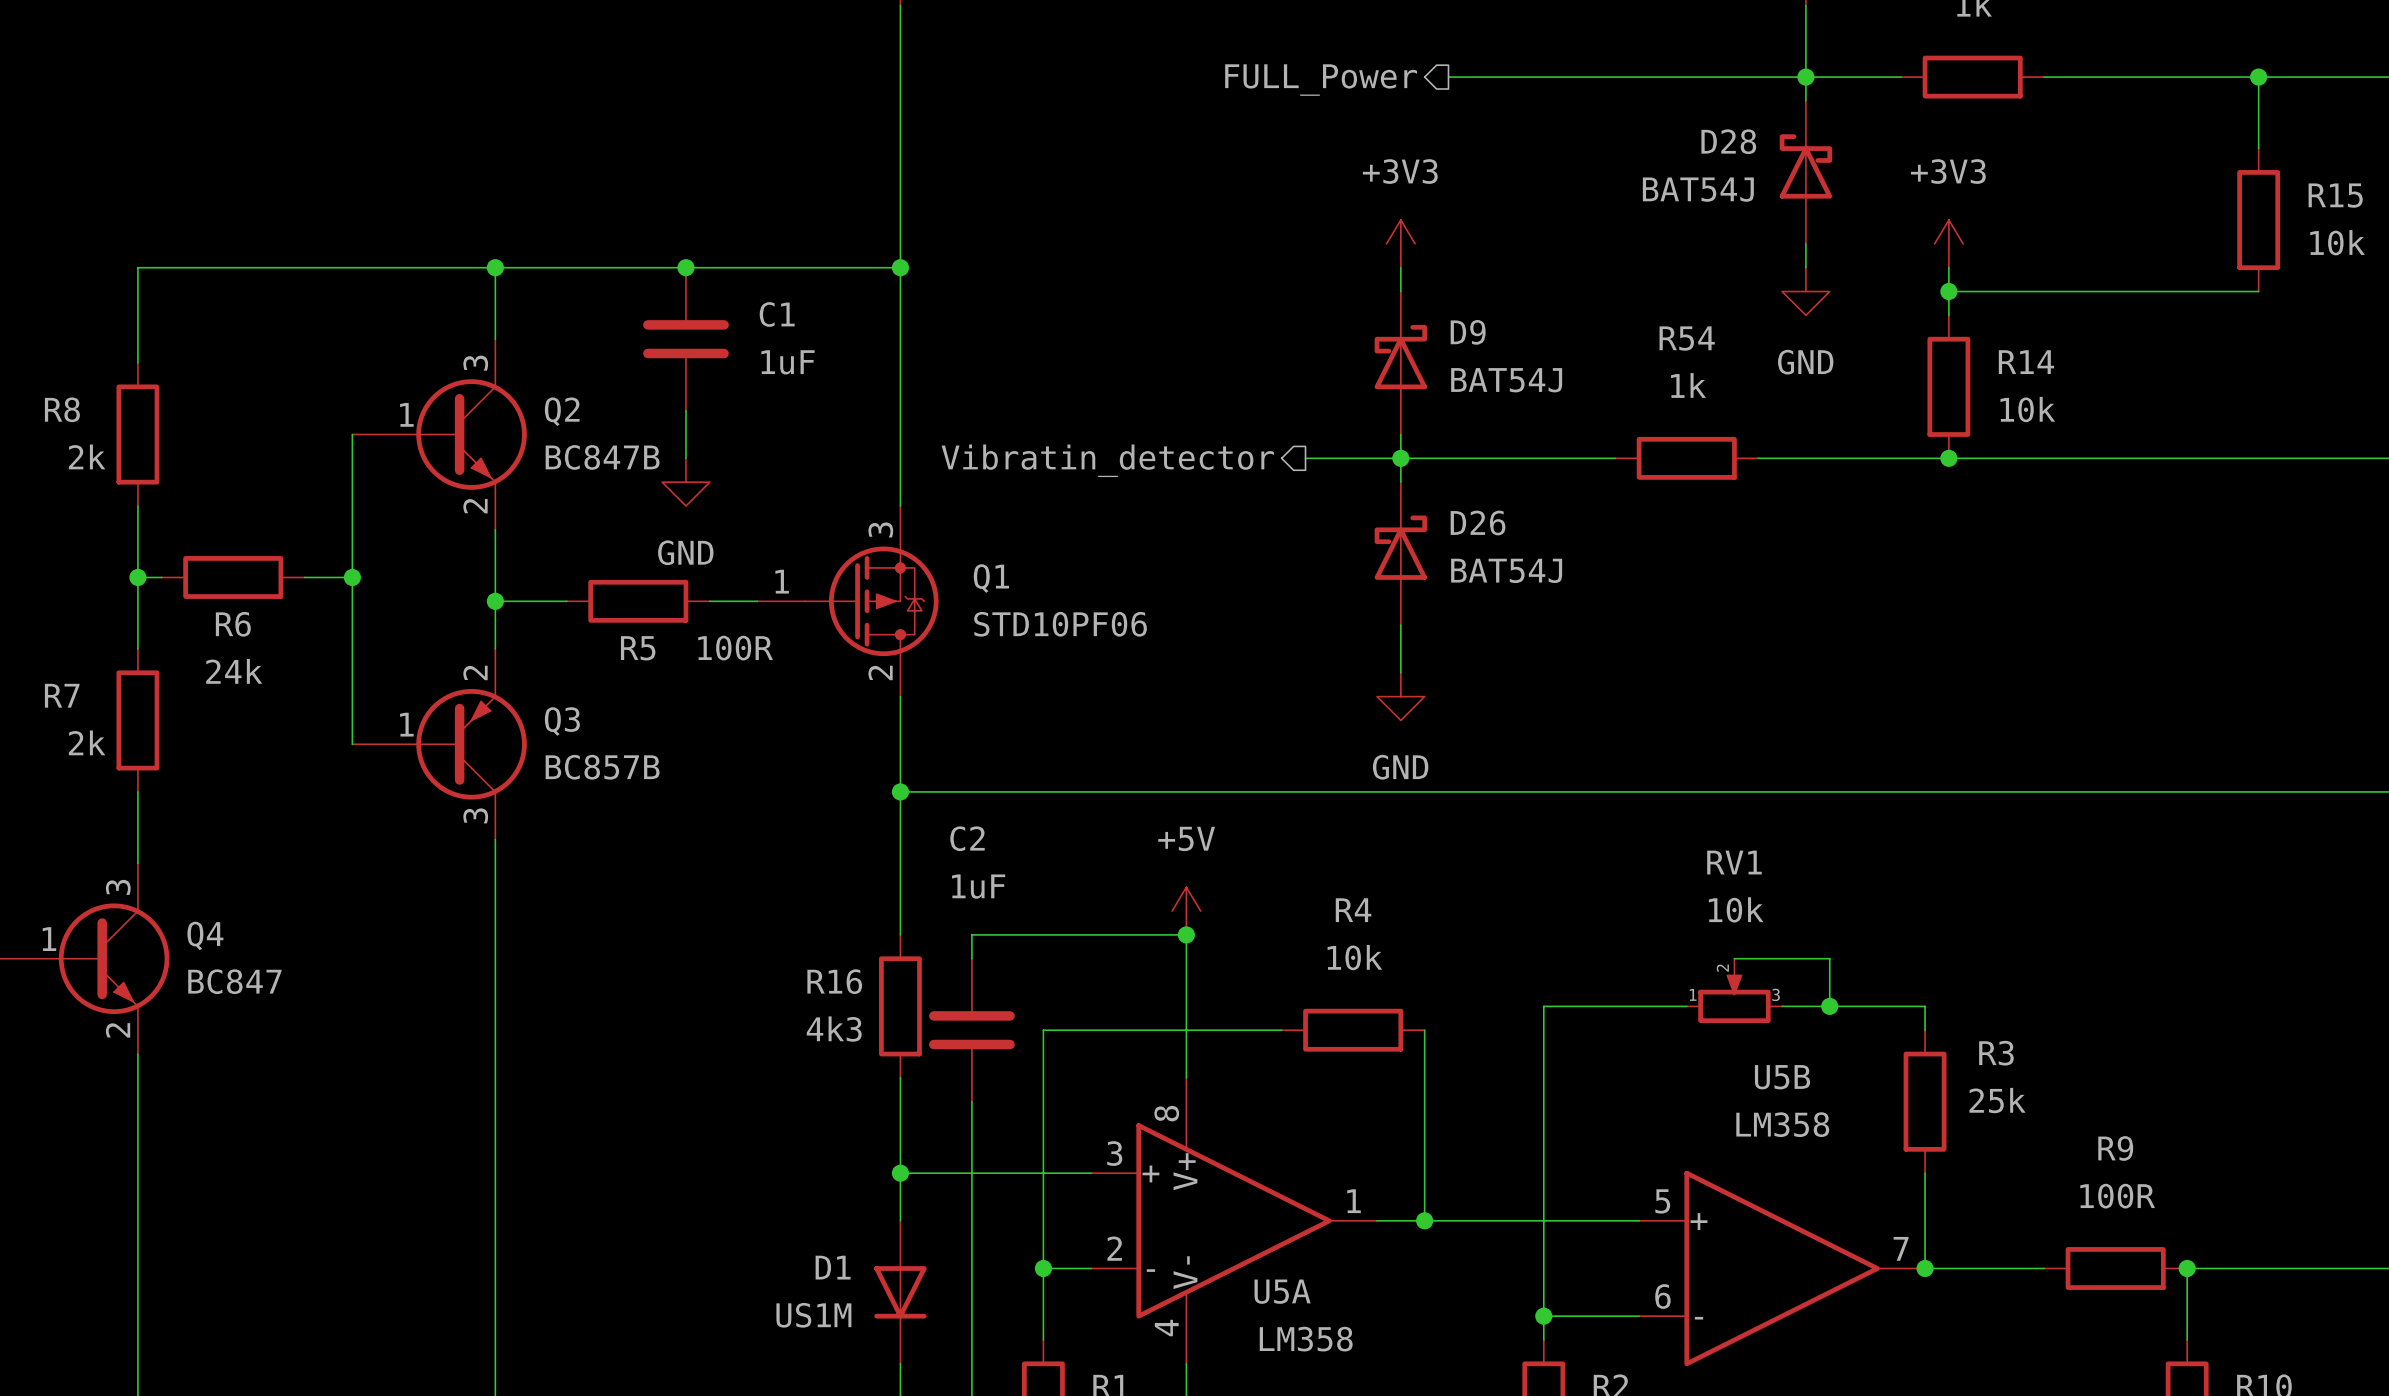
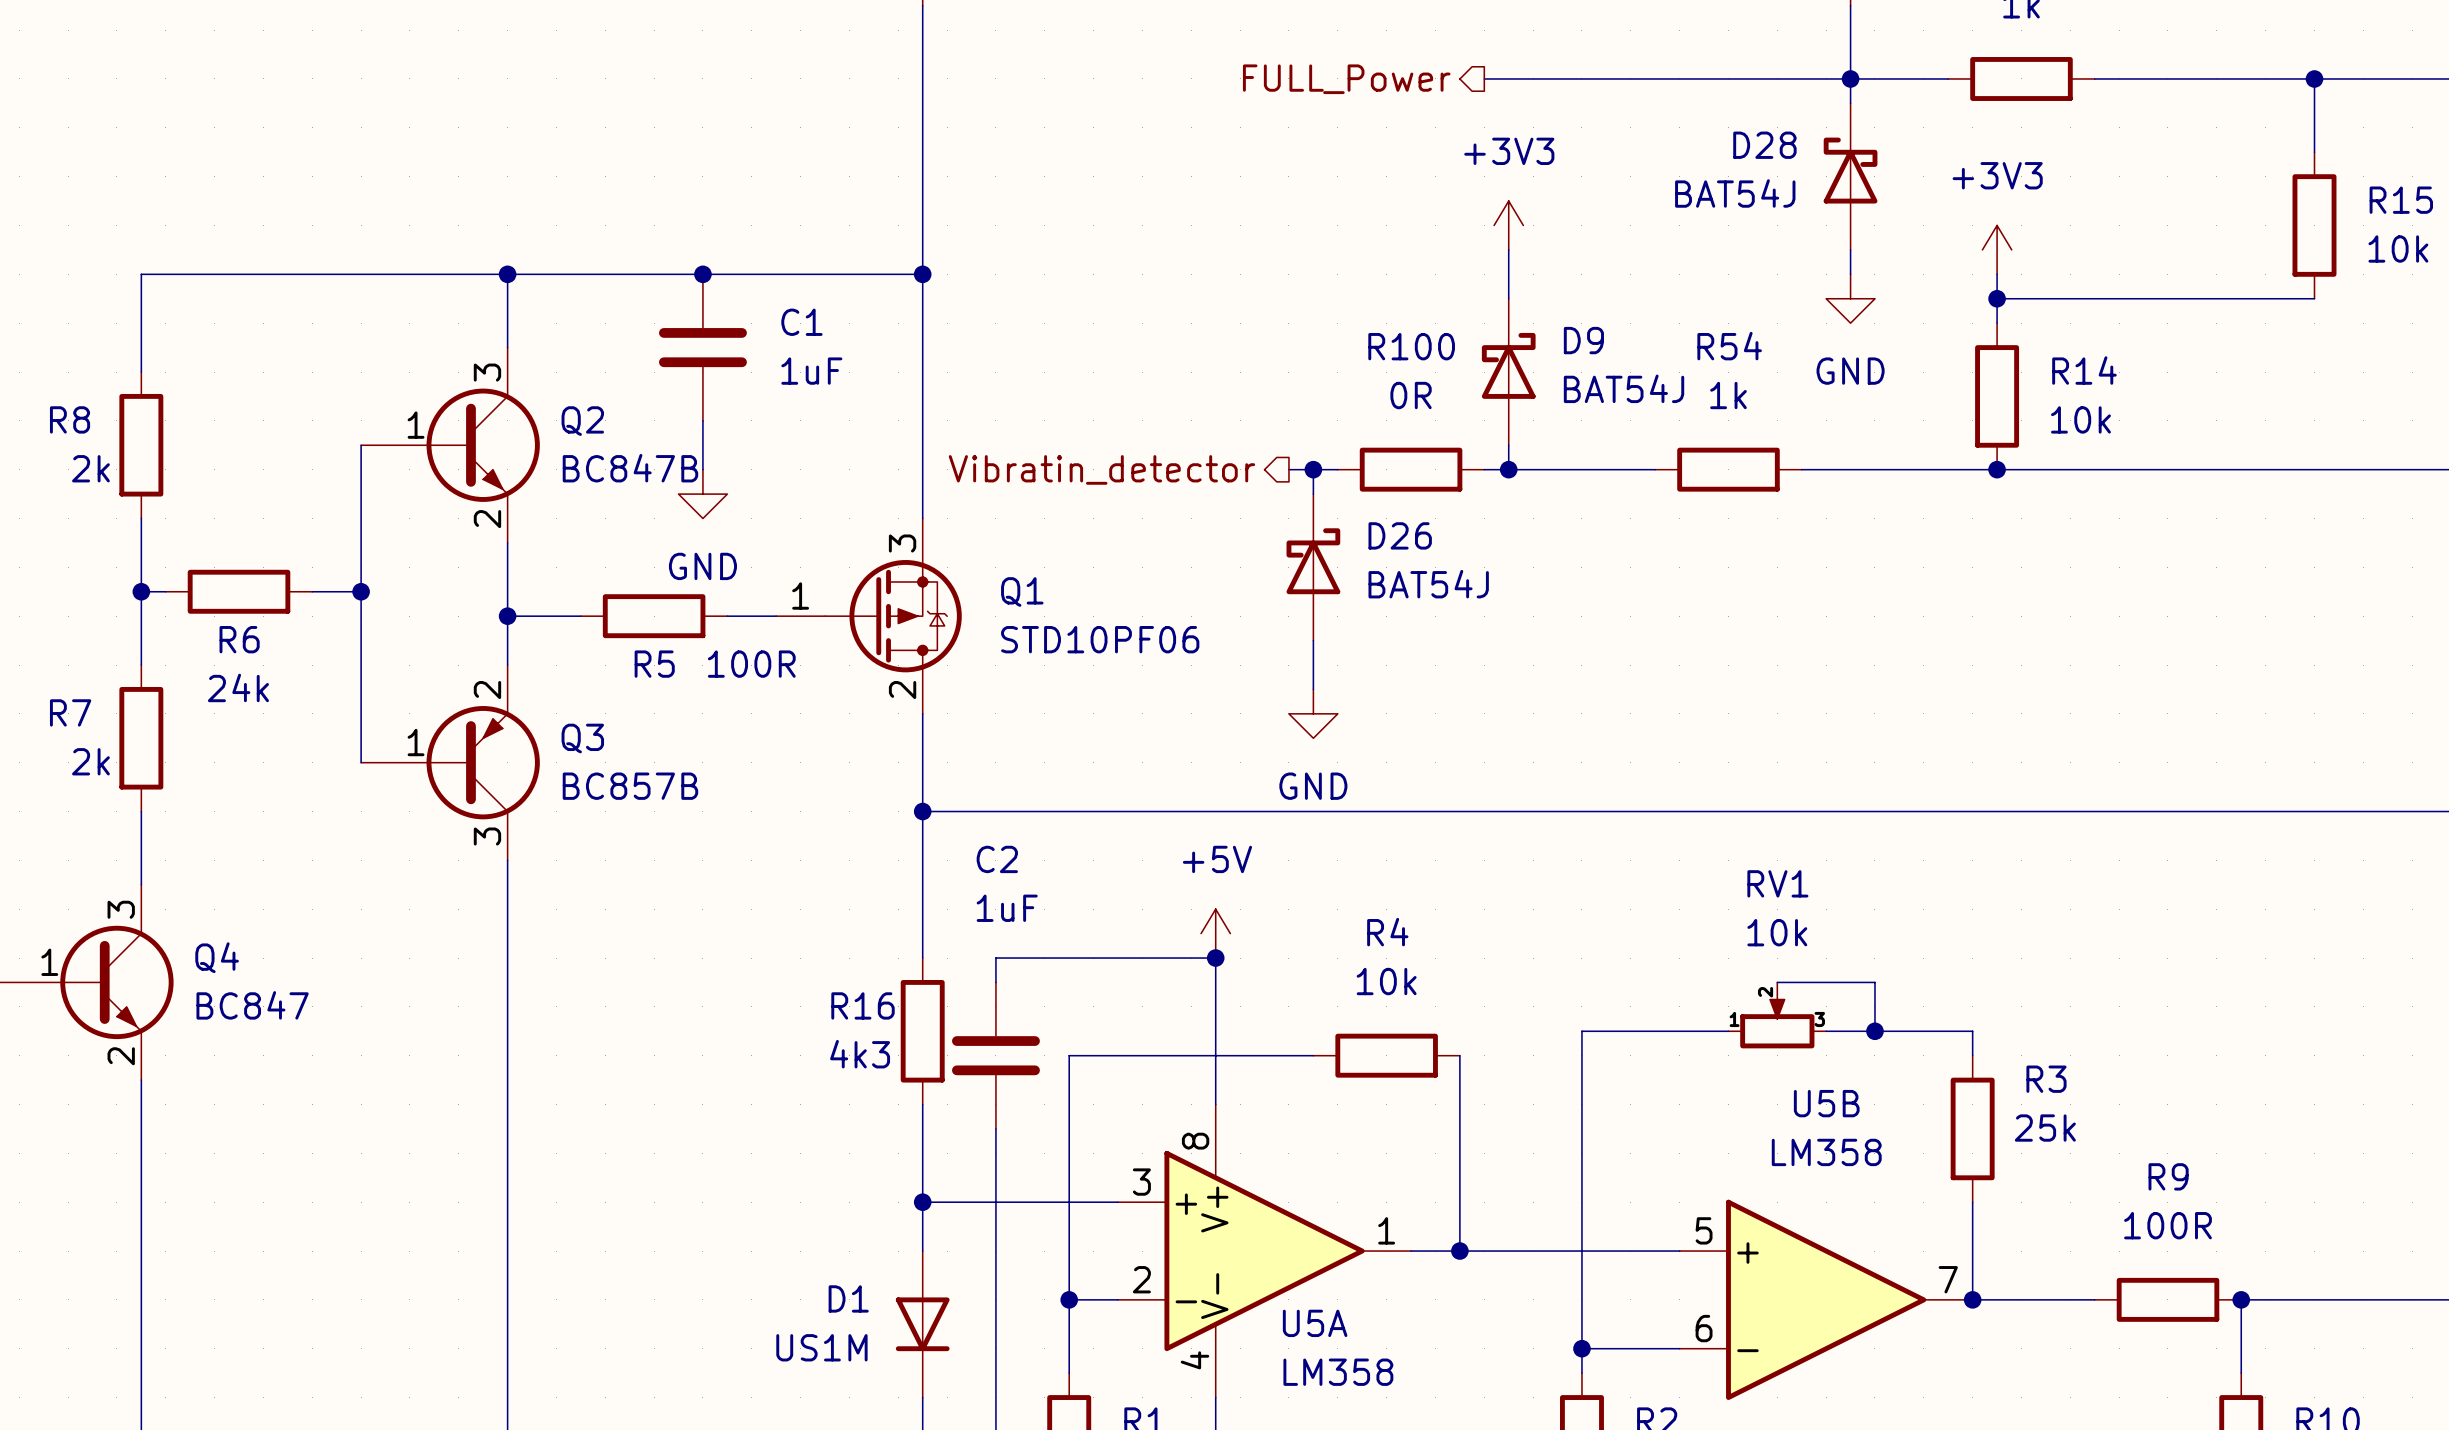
power symbol position: +3V3 (1400, 243) -> +3V3 (1508, 225)
wire: (1400, 267) (1400, 291) -> (1313, 469) (1313, 494)
D9 position: (1400, 363) -> (1508, 372)
wire: (1400, 434) (1400, 482) -> (1313, 640) (1313, 689)
wire: none -> (1508, 445) (1508, 469)
junction: none -> (1313, 469)
wire: (1305, 458) (1448, 458) -> (1337, 469) (1288, 469)
R100: none -> 0R (1411, 469)
junction: (1400, 458) -> none
junction: none -> (1508, 469)
hierarchical label position: Vibratin_detector (1107, 460) -> Vibratin_detector (1101, 469)
D26 position: (1400, 553) -> (1313, 567)
wire: (1400, 625) (1400, 672) -> (1508, 249) (1508, 298)
power symbol position: GND (1400, 696) -> GND (1313, 713)

